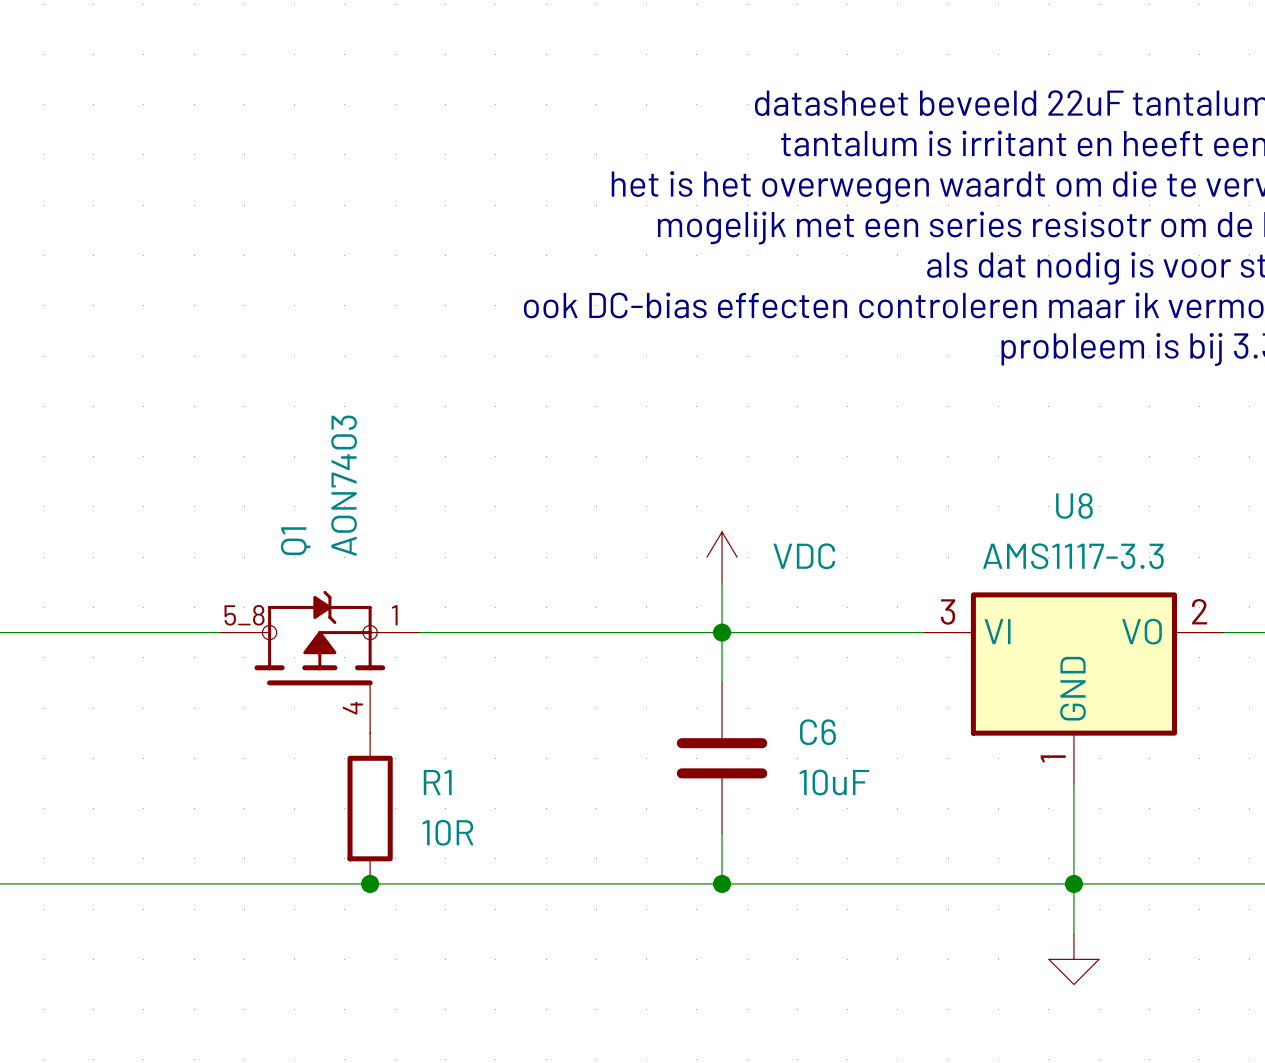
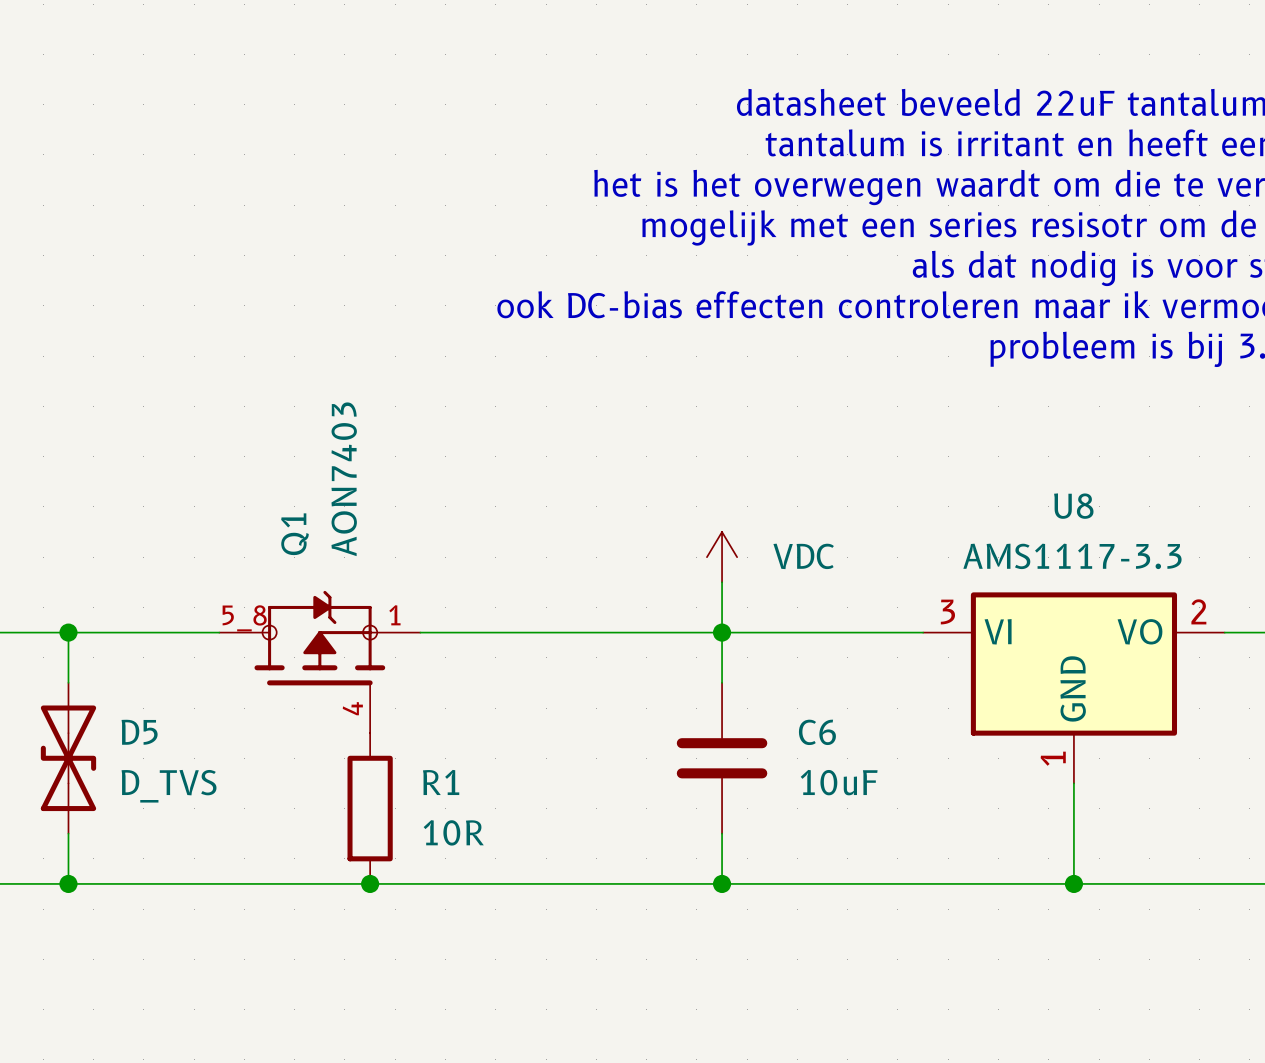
wire: none -> (68, 632) (68, 682)
junction: none -> (68, 632)
D5: none -> D_TVS (68, 758)
wire: none -> (68, 833) (68, 883)
junction: none -> (68, 883)
wire: (1073, 883) (1073, 934) -> none
power symbol: (1073, 959) -> none

